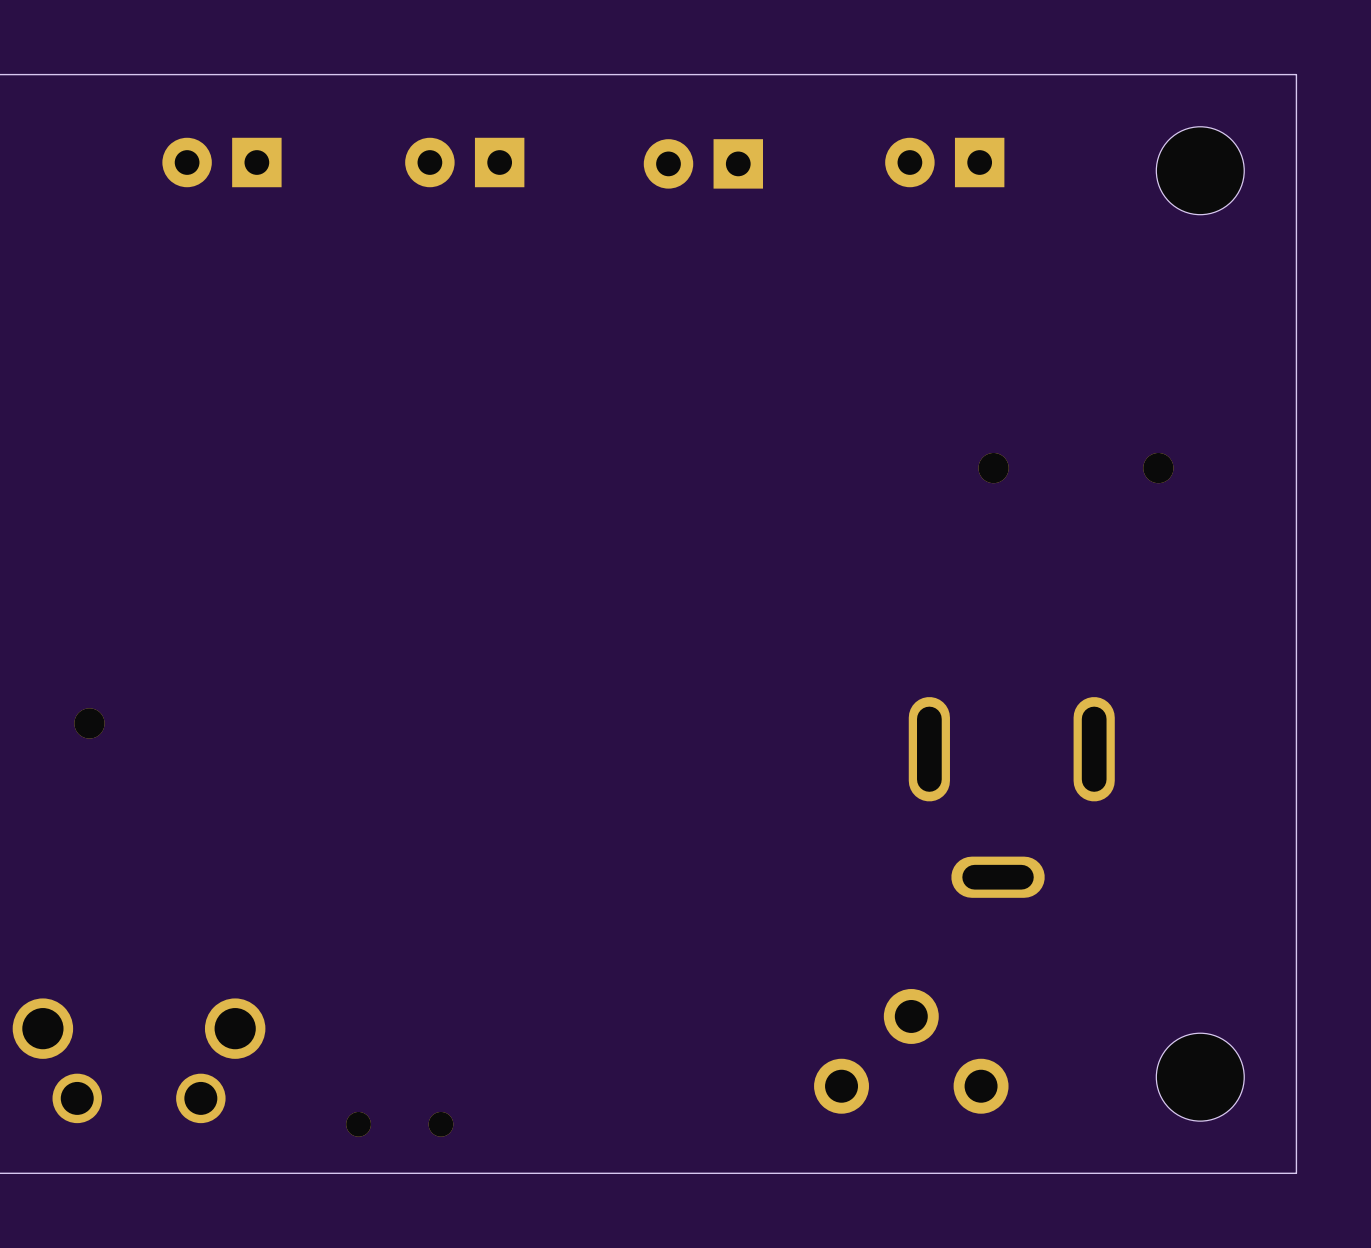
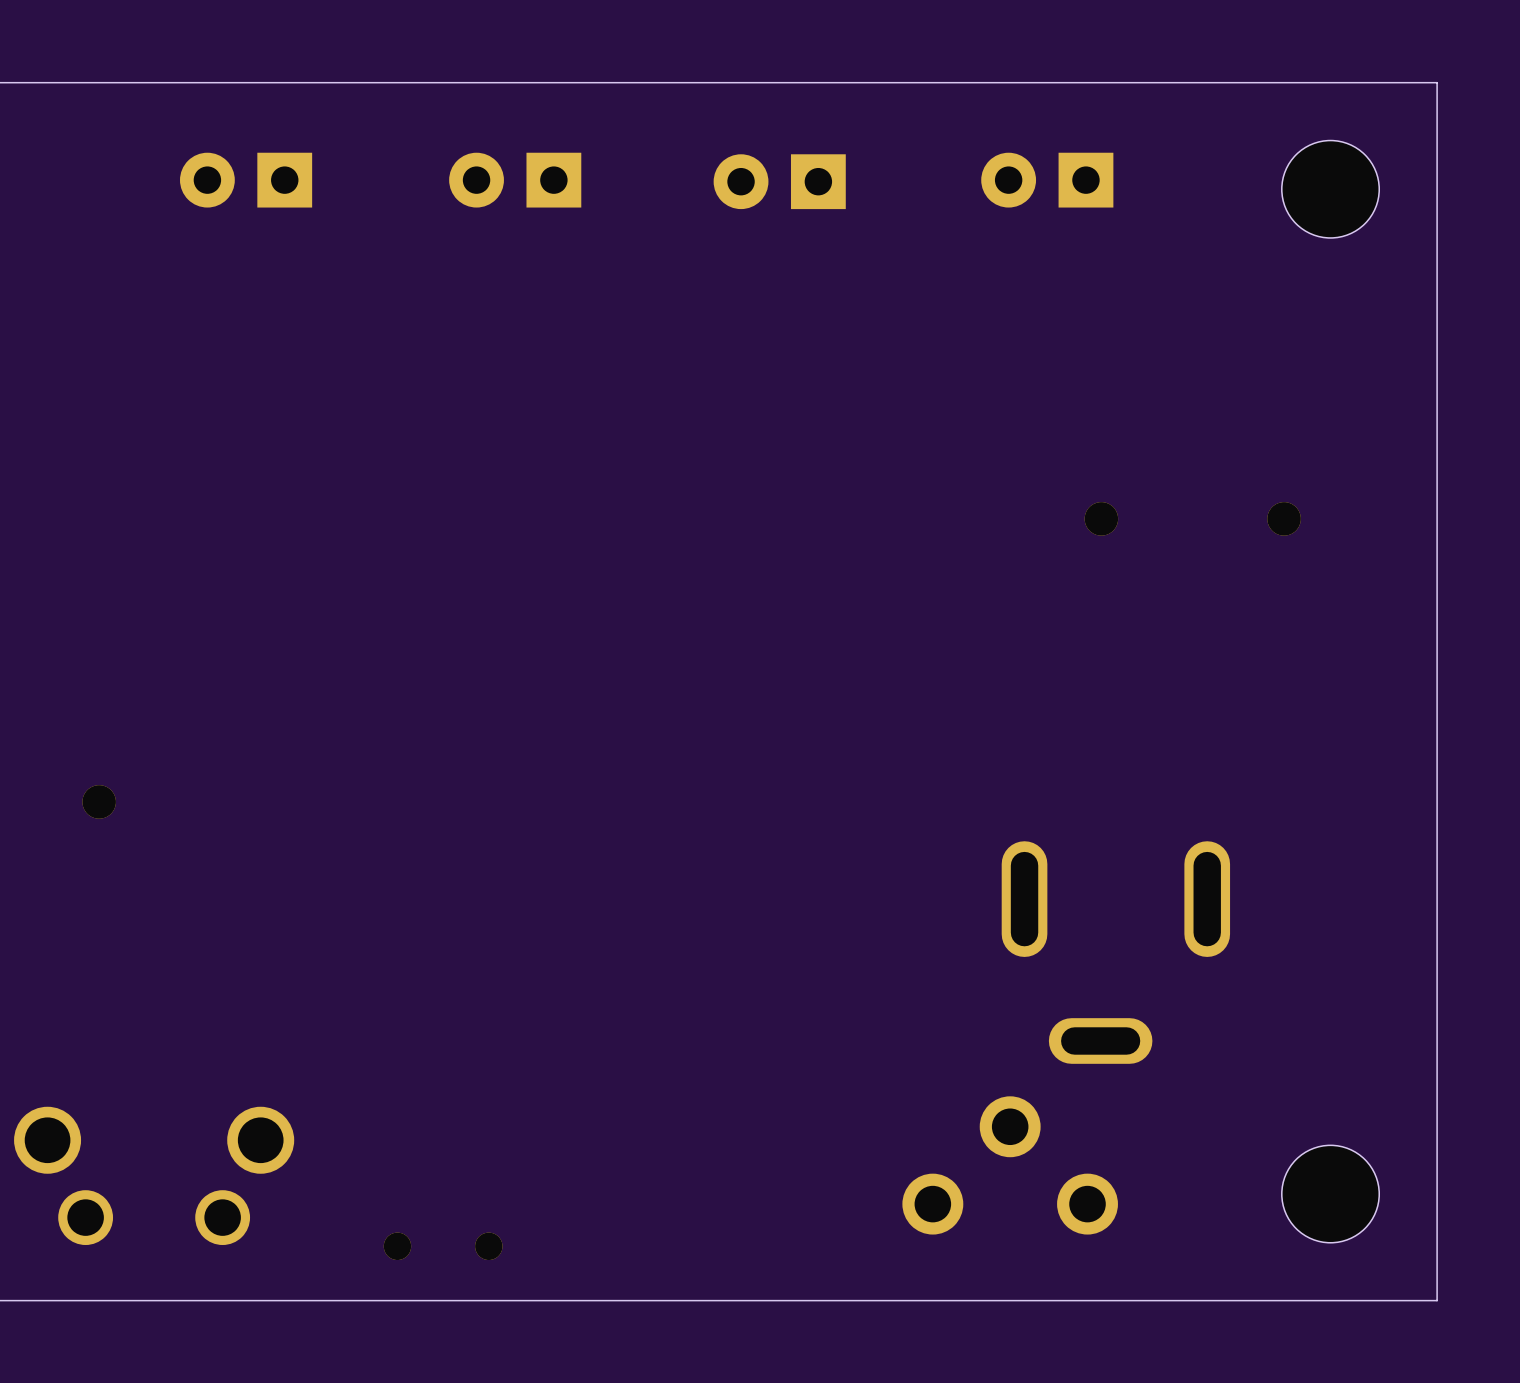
part position: (1011, 797) -> (1115, 952)

